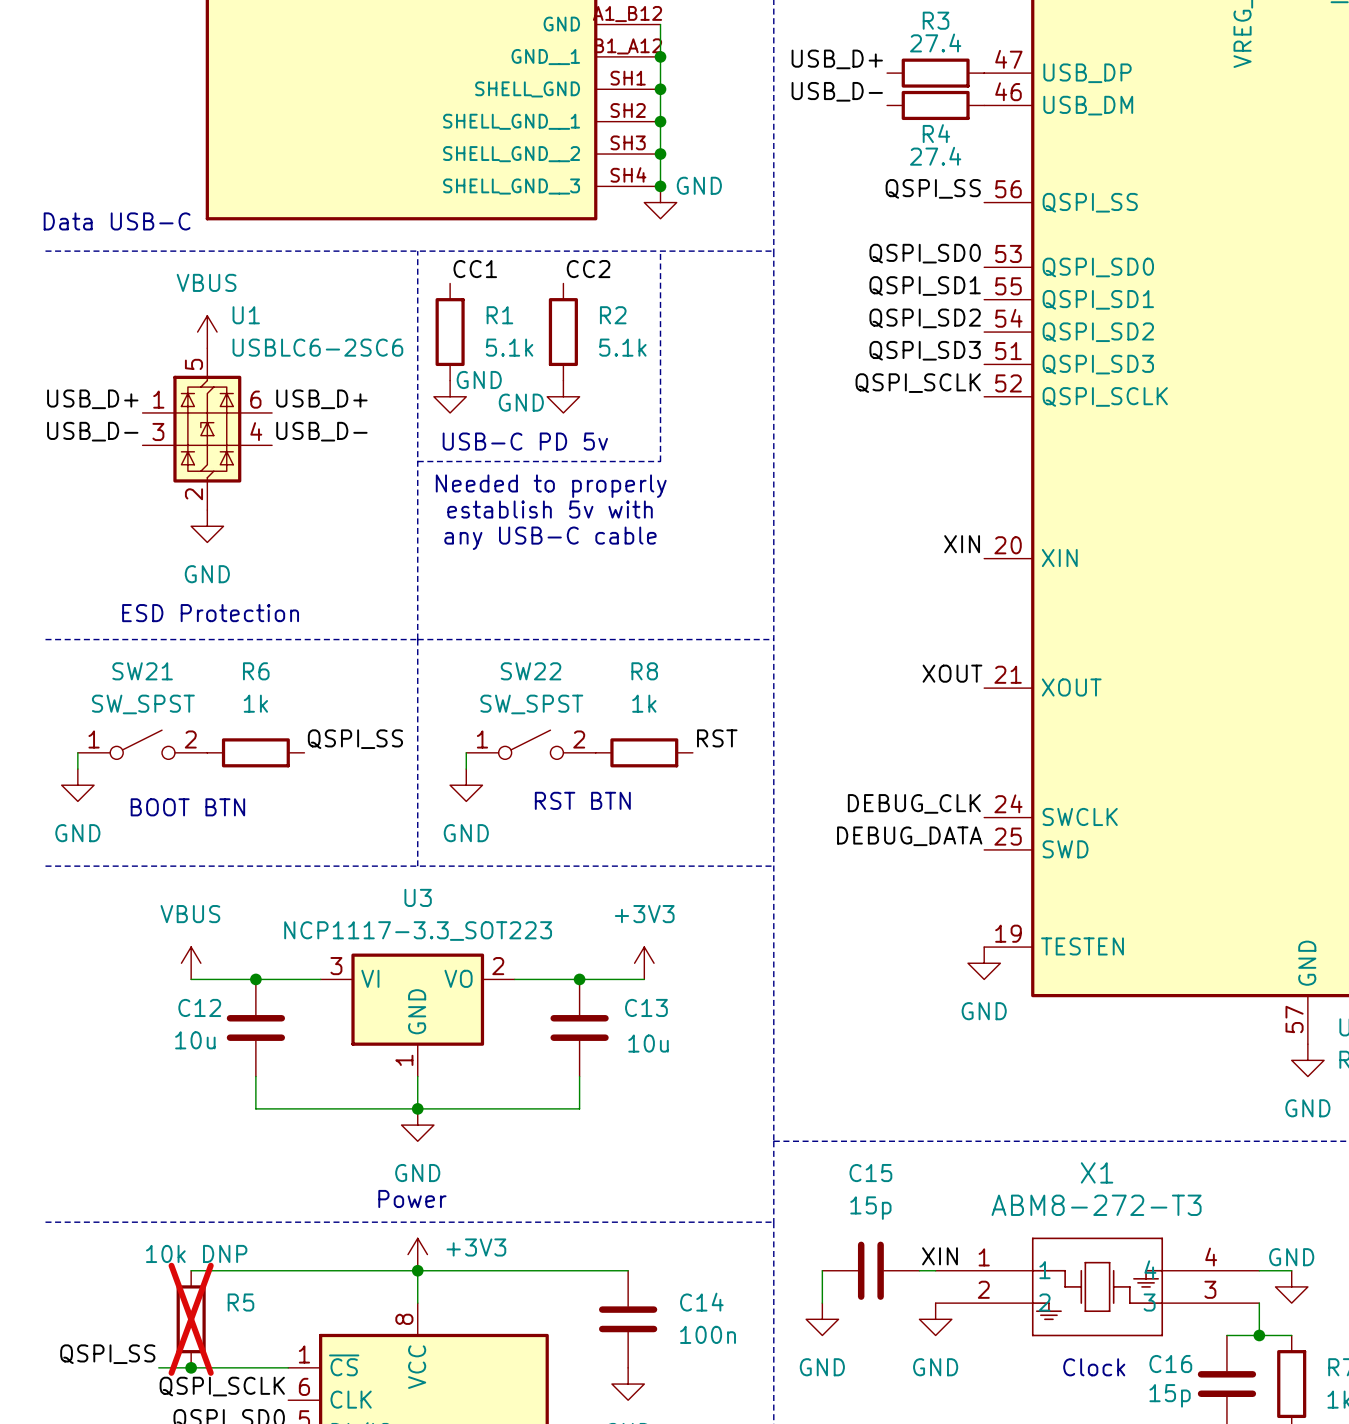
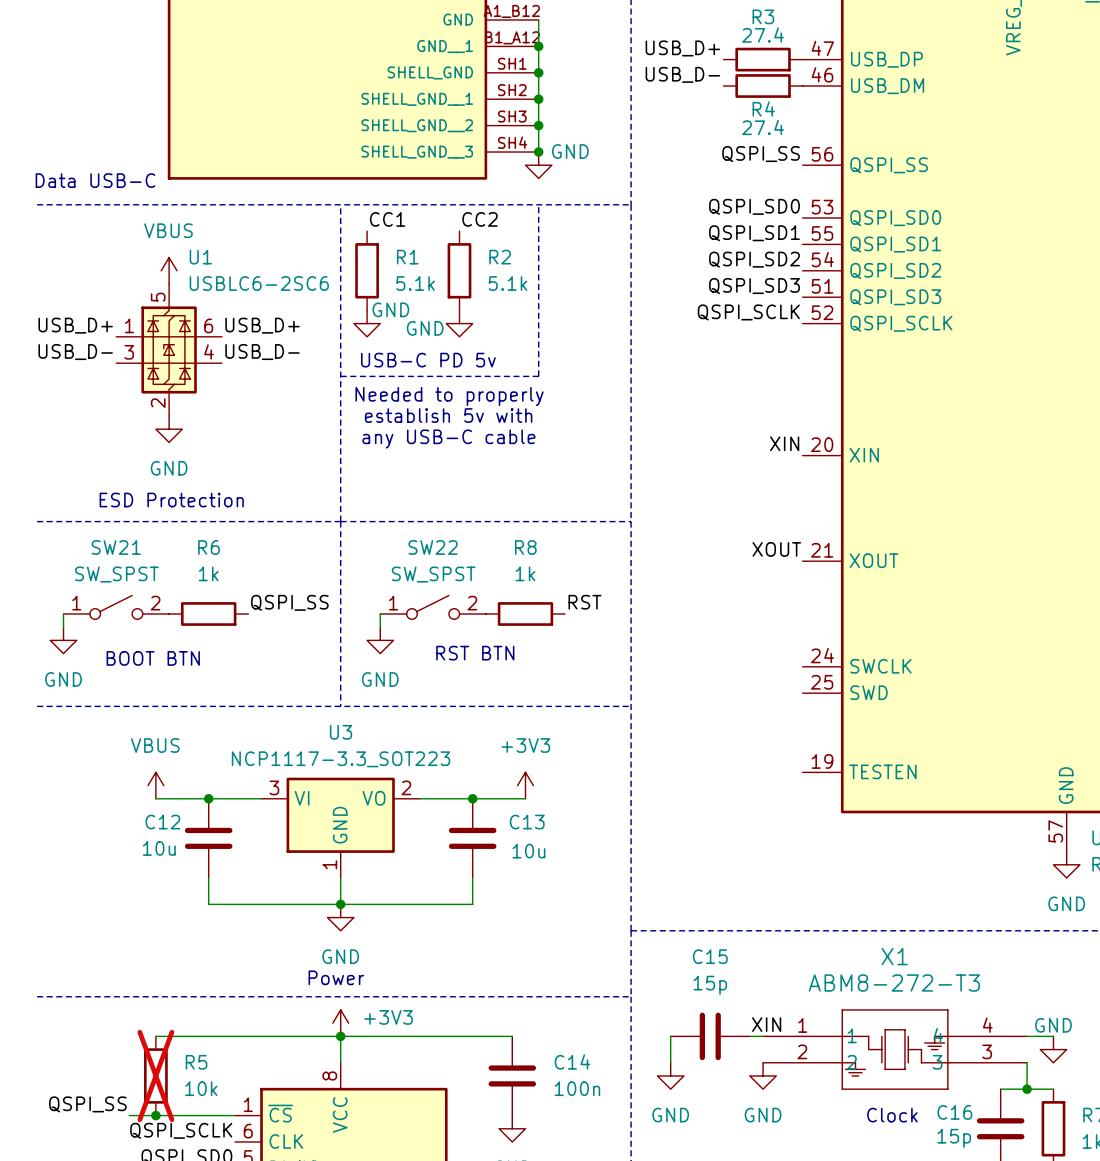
label: DEBUG_CLK (914, 803) -> none
label: DEBUG_DATA (909, 836) -> none
power symbol: GND (984, 963) -> none
R5 value: 10k DNP (196, 1253) -> 10k (201, 1088)

